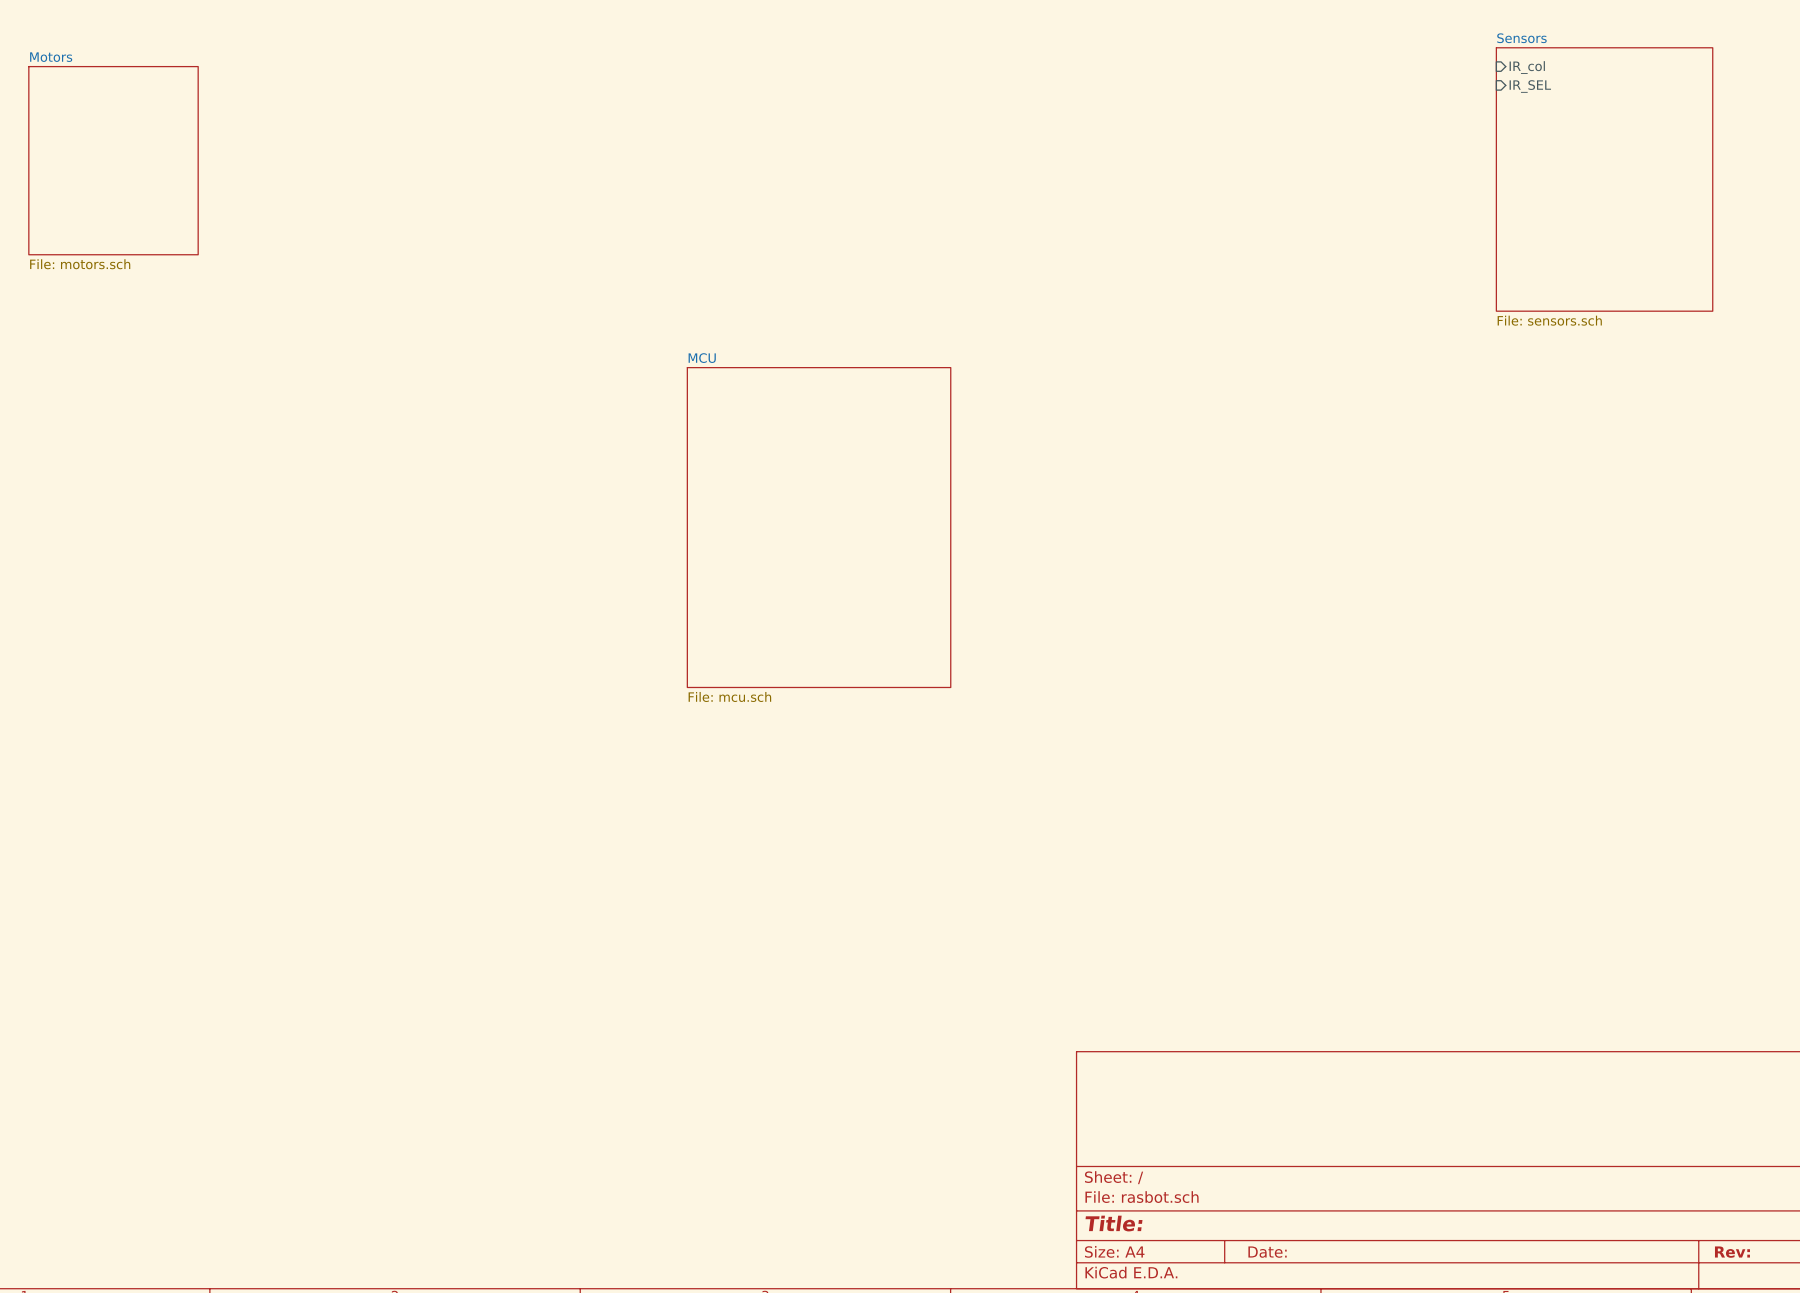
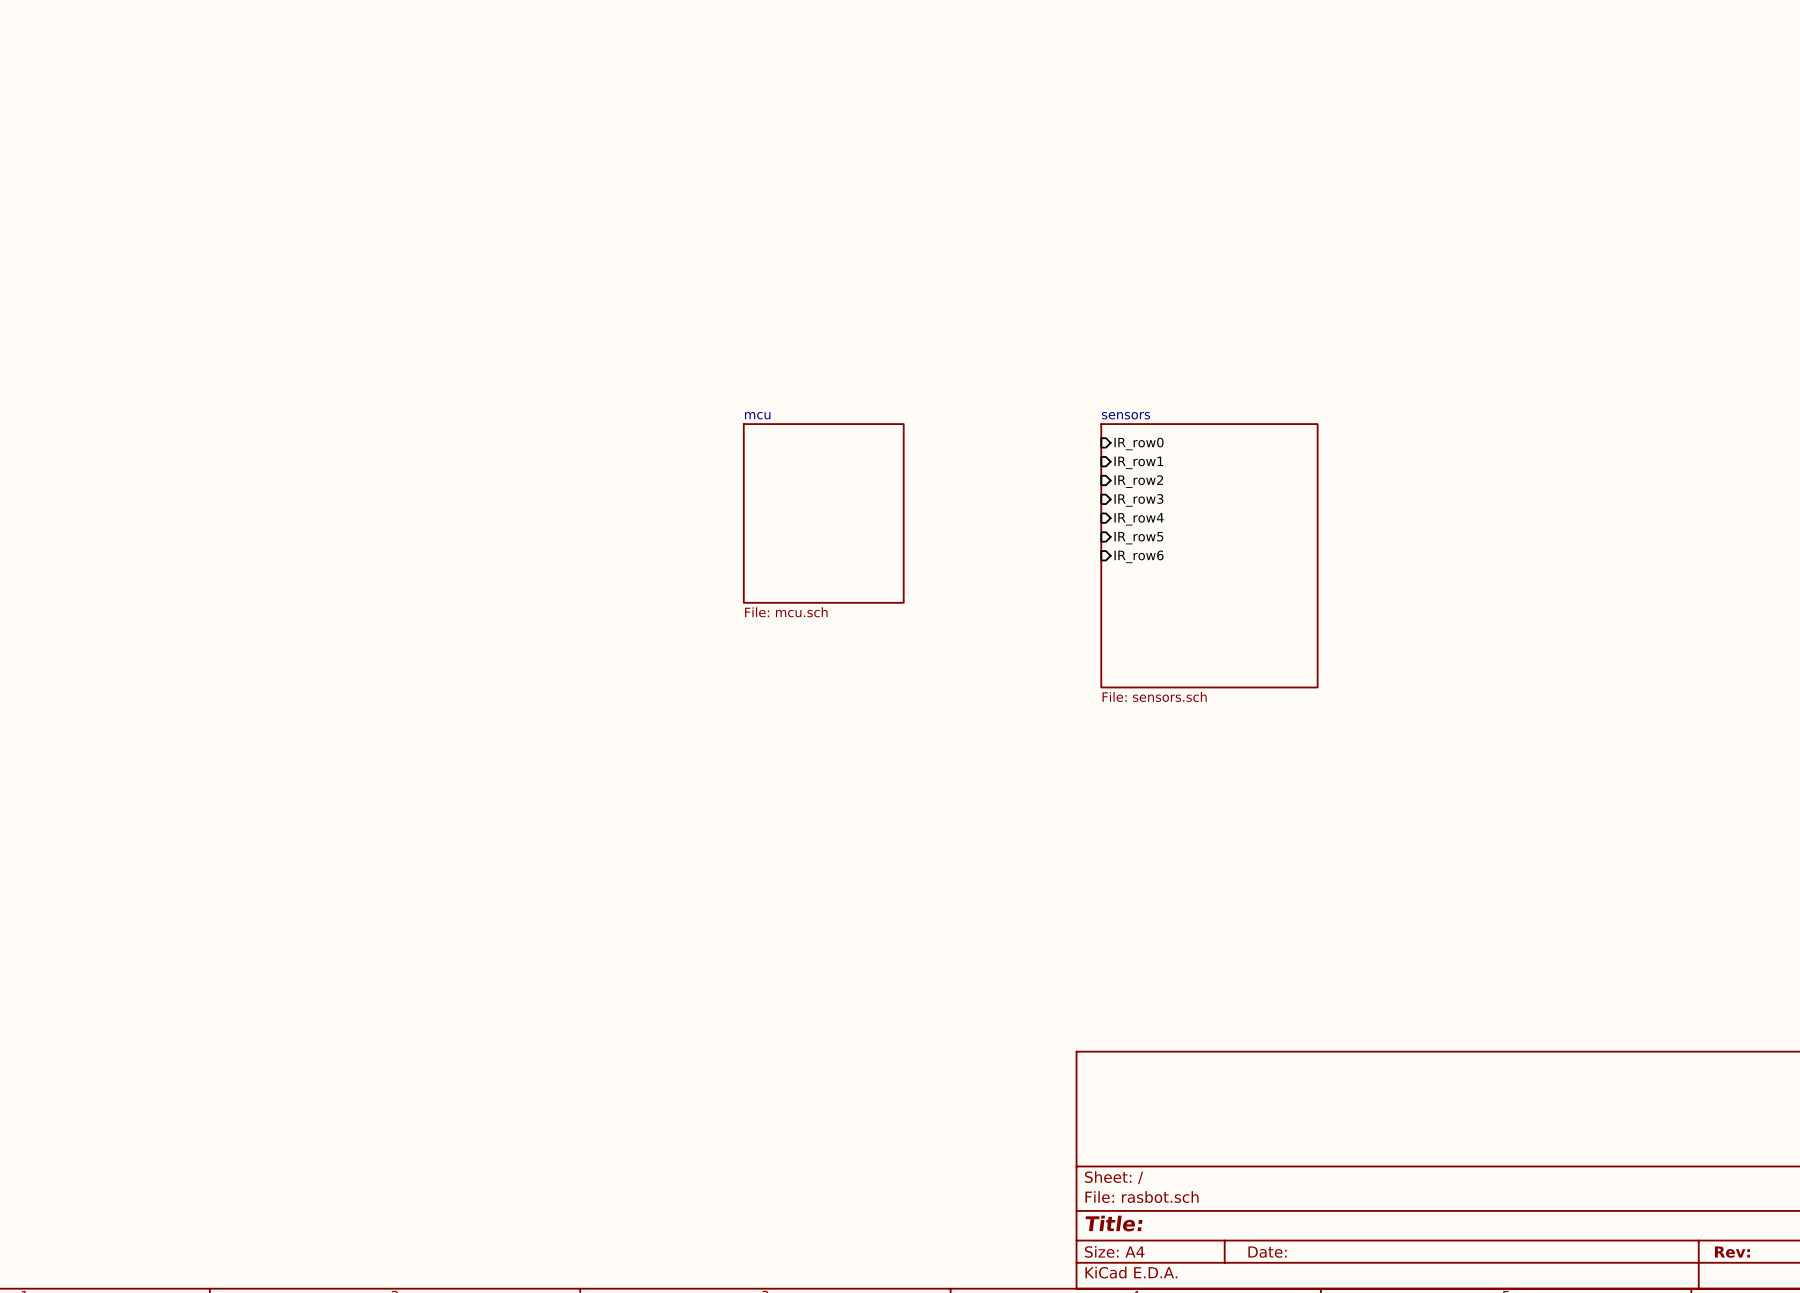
sheet pin: IR_col (1527, 67) -> none
sheet pin: IR_SEL (1530, 86) -> none
sheet Motors: File: motors.sch (113, 160) -> none
sheet Sensors: File: sensors.sch (1604, 179) -> none
sheet pin: none -> IR_row0 (1139, 443)
sheet pin: none -> IR_row1 (1138, 462)
sheet pin: none -> IR_row2 (1138, 481)
sheet pin: none -> IR_row3 (1138, 500)
sheet mcu: none -> File: mcu.sch (823, 513)
sheet pin: none -> IR_row4 (1139, 519)
sheet MCU: File: mcu.sch (819, 527) -> none
sheet pin: none -> IR_row5 (1138, 538)
sheet sensors: none -> File: sensors.sch (1209, 555)
sheet pin: none -> IR_row6 (1139, 556)

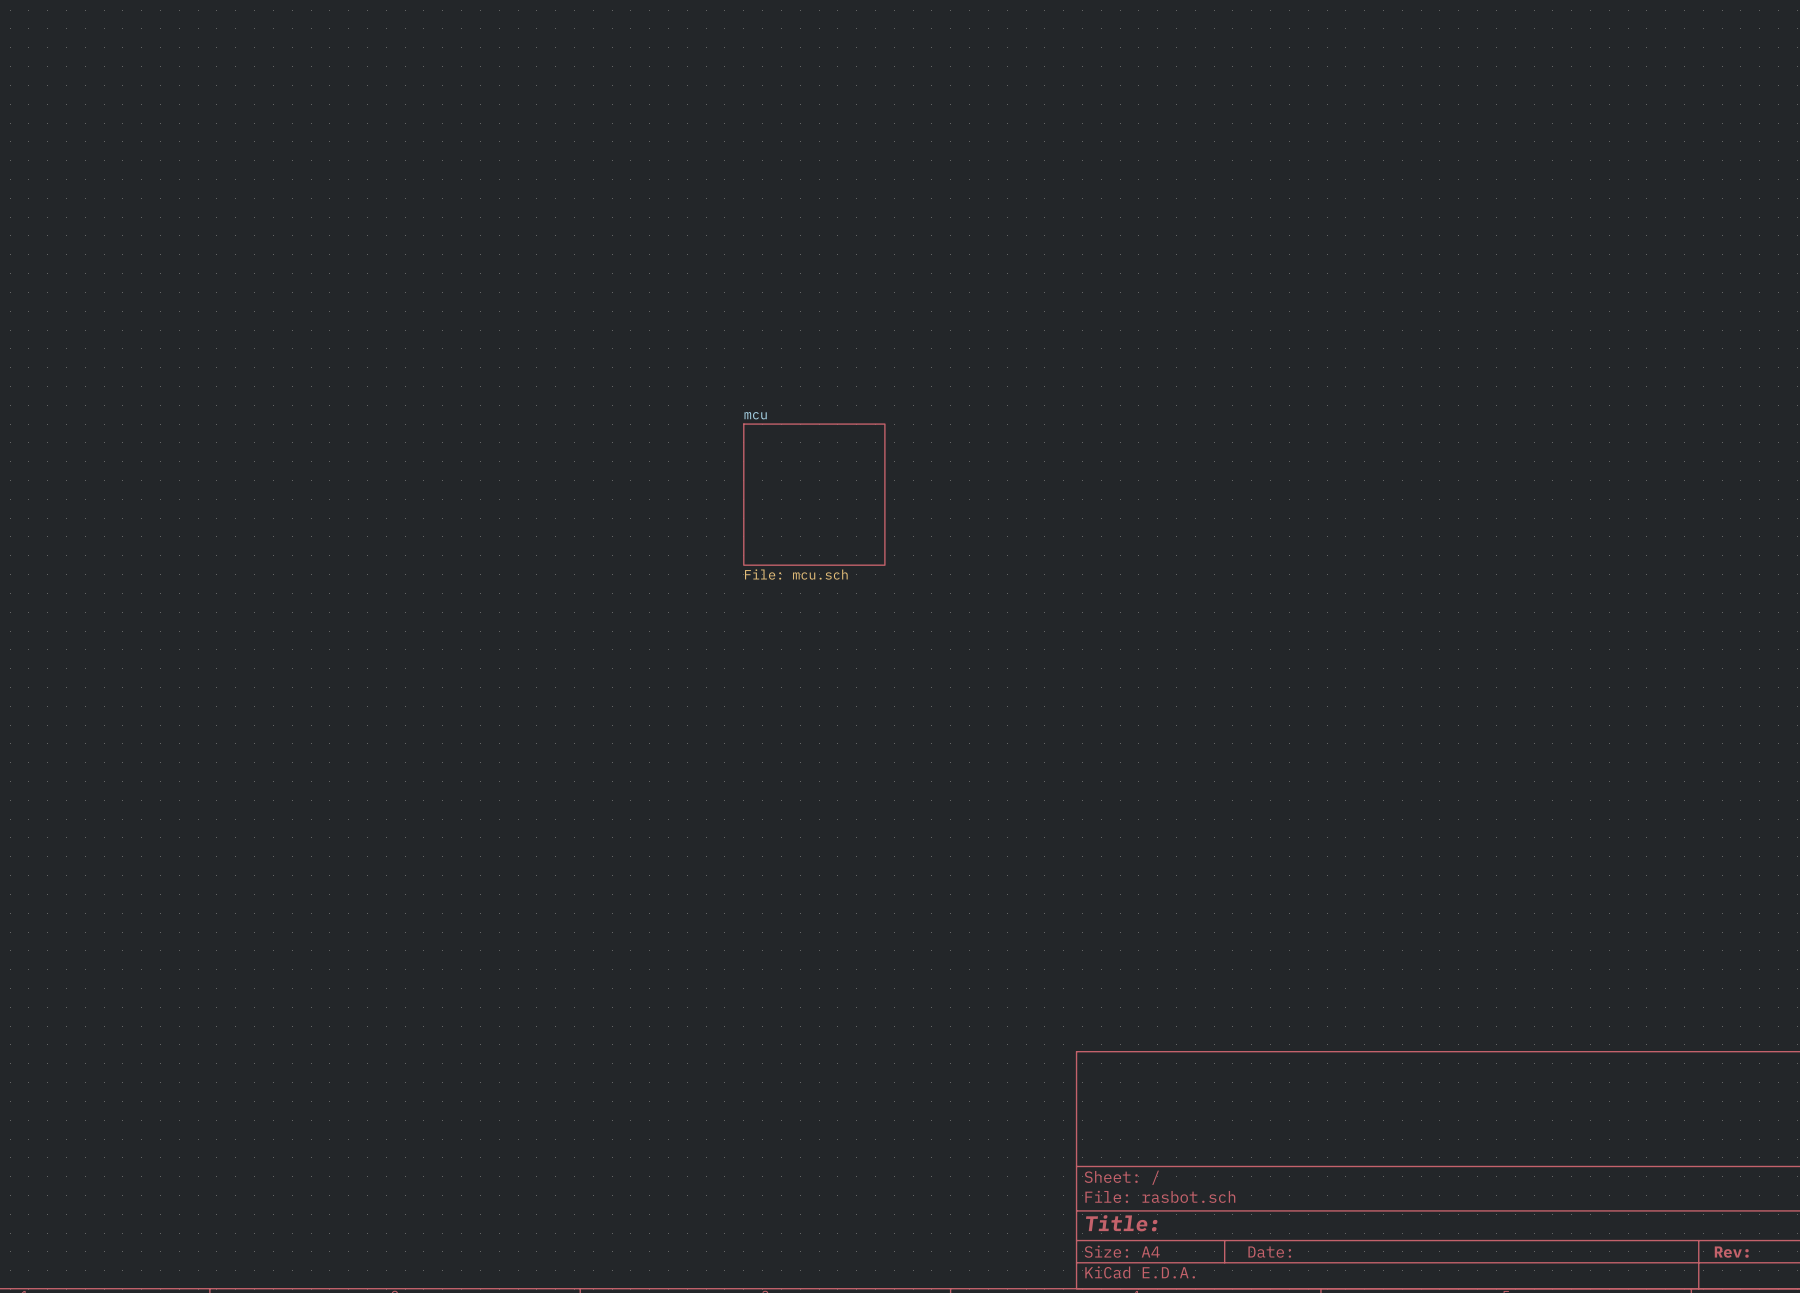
sheet pin: IR_row0 (1139, 443) -> none
sheet pin: IR_row1 (1138, 462) -> none
sheet pin: IR_row2 (1138, 481) -> none
sheet mcu: none -> File: mcu.sch (814, 494)
sheet pin: IR_row3 (1138, 500) -> none
sheet mcu: File: mcu.sch (823, 513) -> none
sheet pin: IR_row4 (1139, 519) -> none
sheet pin: IR_row5 (1138, 538) -> none
sheet sensors: File: sensors.sch (1209, 555) -> none
sheet pin: IR_row6 (1139, 556) -> none

